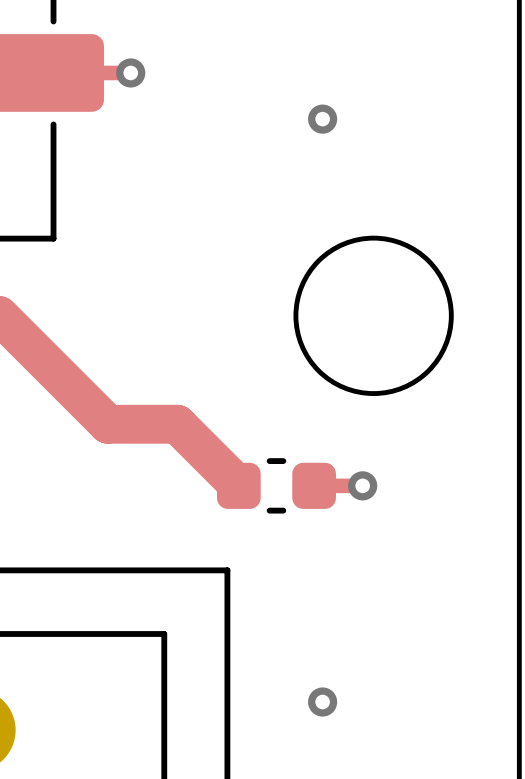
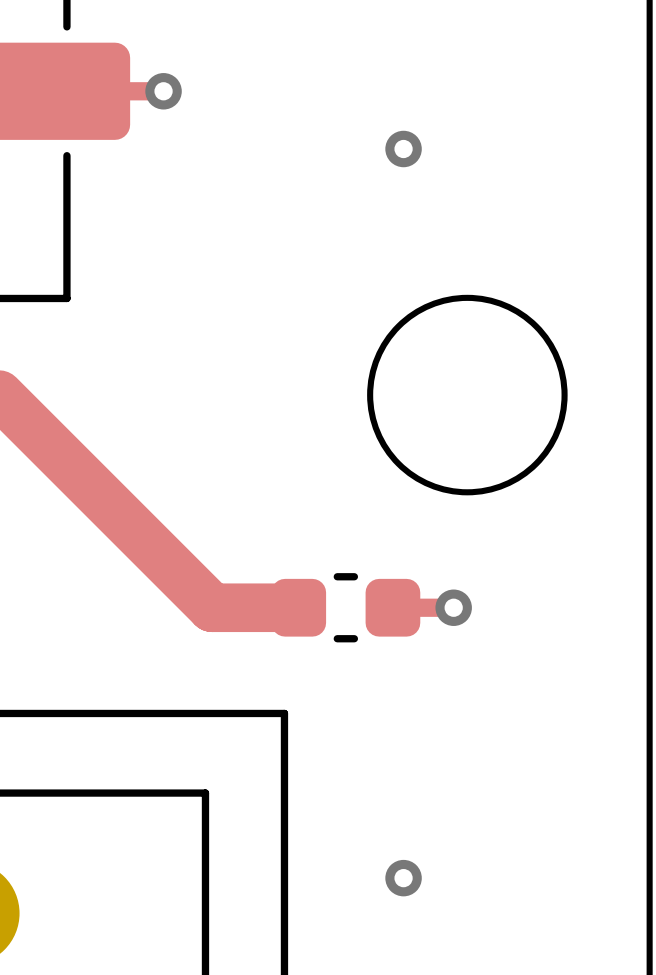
track: (108, 424) (177, 424) (238, 485) -> (135, 530) (212, 607) (298, 607)

